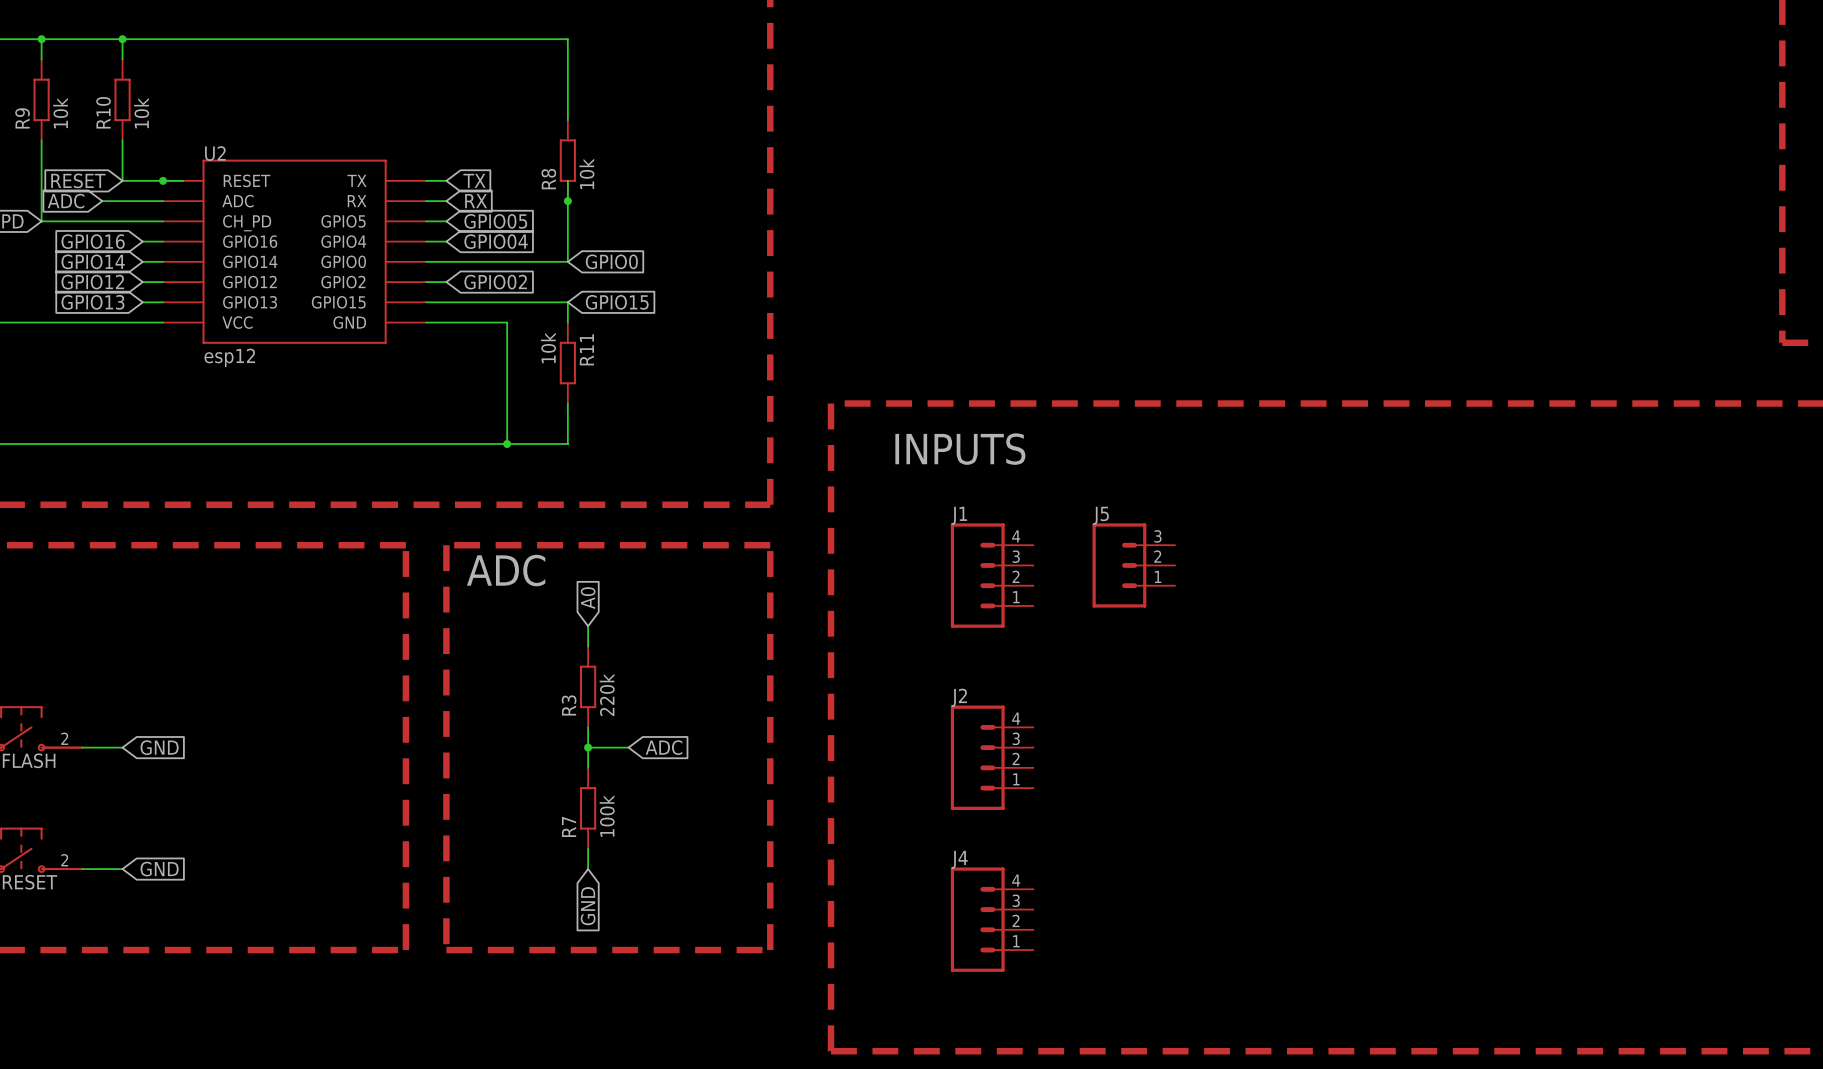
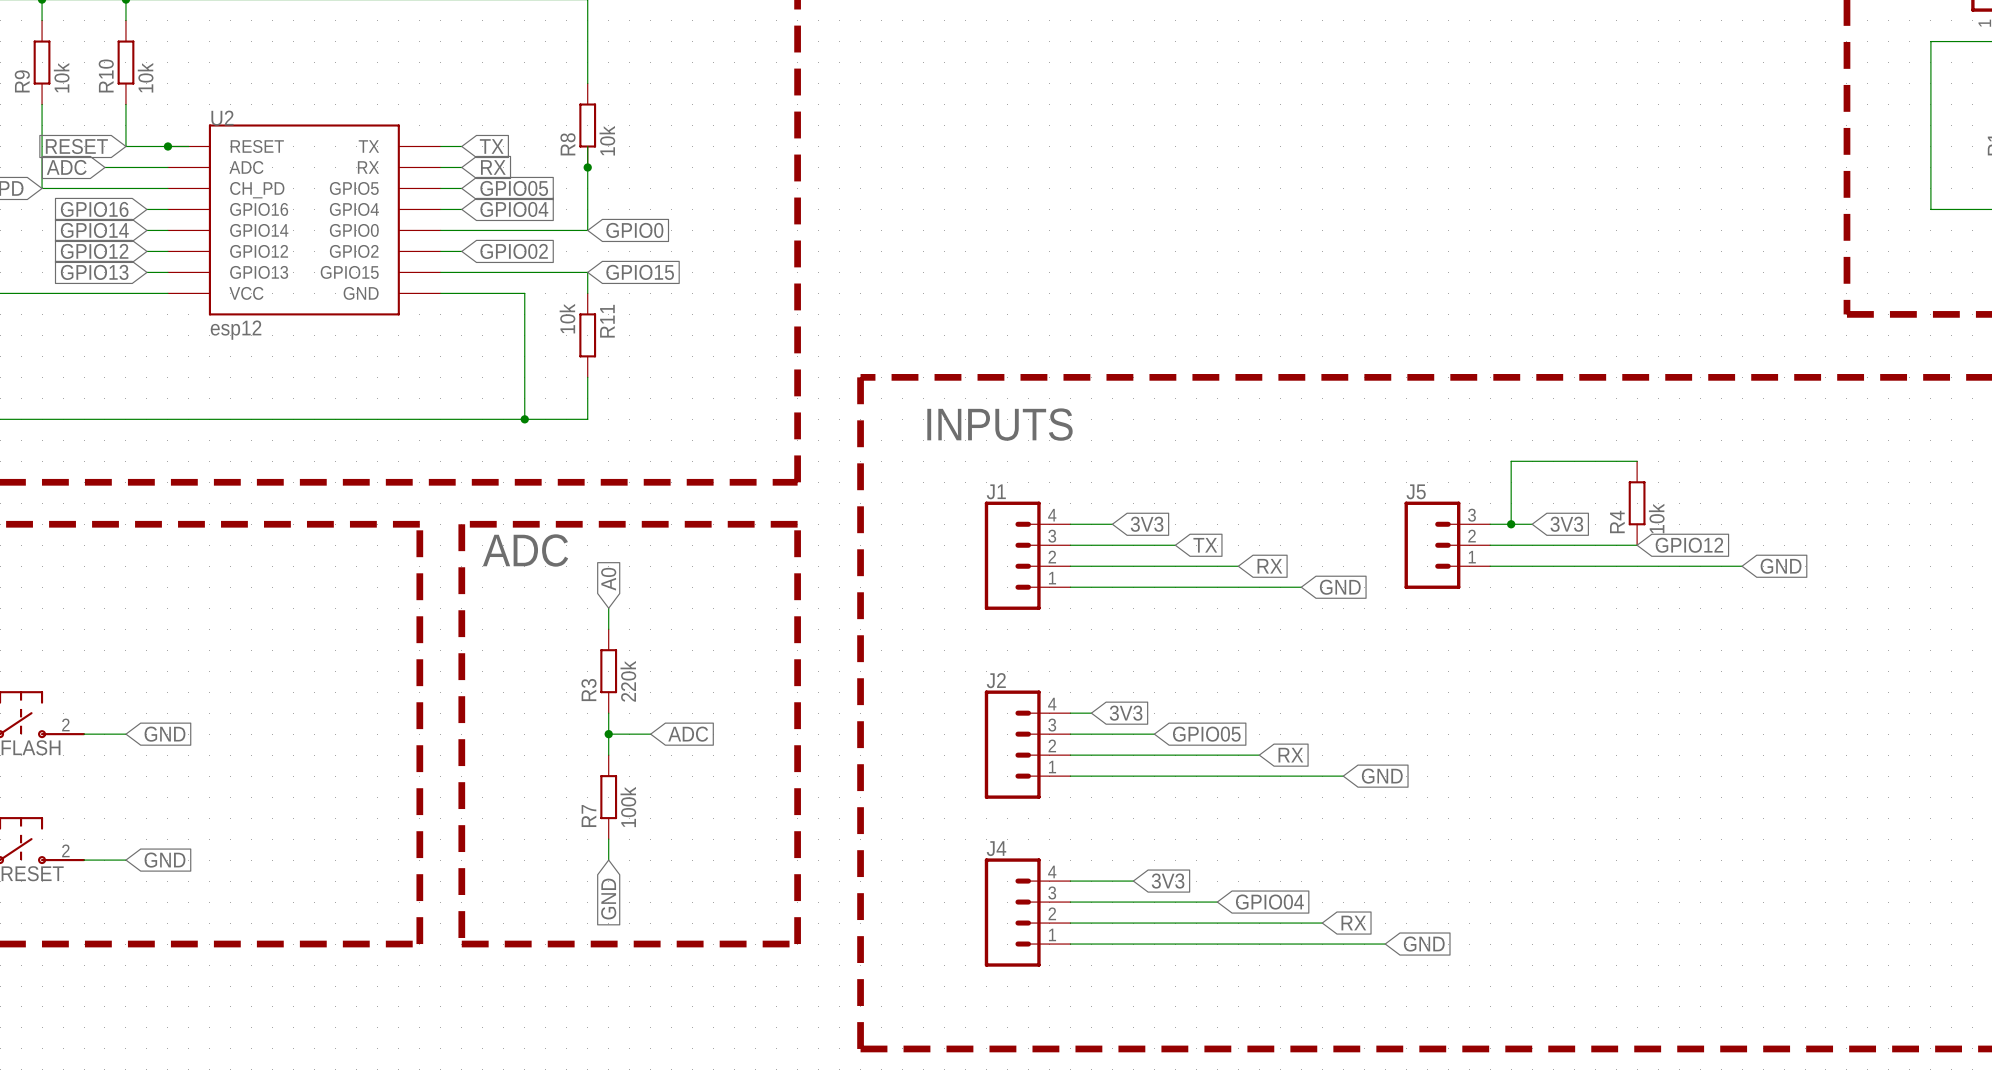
wire: none -> (1637, 461) (1511, 461) (1511, 524)
R4: none -> 10k (1637, 503)
wire: none -> (1070, 524) (1112, 524)
global label: none -> 3V3 (1147, 524)
wire: none -> (1490, 524) (1532, 524)
junction: none -> (1511, 524)
global label: none -> 3V3 (1566, 524)
wire: none -> (1070, 545) (1175, 545)
J5 position: (1133, 565) -> (1447, 545)
global label: none -> TX (1205, 545)
wire: none -> (1490, 545) (1637, 545)
global label: none -> GPIO12 (1689, 545)
wire: none -> (1070, 566) (1238, 566)
global label: none -> RX (1269, 566)
wire: none -> (1490, 566) (1742, 566)
global label: none -> GND (1781, 566)
wire: none -> (1070, 587) (1301, 587)
global label: none -> GND (1340, 587)
wire: none -> (1070, 713) (1091, 713)
global label: none -> 3V3 (1126, 713)
wire: none -> (1070, 734) (1154, 734)
global label: none -> GPIO05 (1206, 734)
wire: none -> (1070, 755) (1259, 755)
global label: none -> RX (1290, 755)
wire: none -> (1070, 776) (1343, 776)
global label: none -> GND (1382, 776)
wire: none -> (1070, 881) (1133, 881)
global label: none -> 3V3 (1168, 881)
wire: none -> (1070, 902) (1217, 902)
global label: none -> GPIO04 (1269, 902)
wire: none -> (1070, 923) (1322, 923)
global label: none -> RX (1353, 923)
wire: none -> (1070, 944) (1385, 944)
global label: none -> GND (1424, 944)

